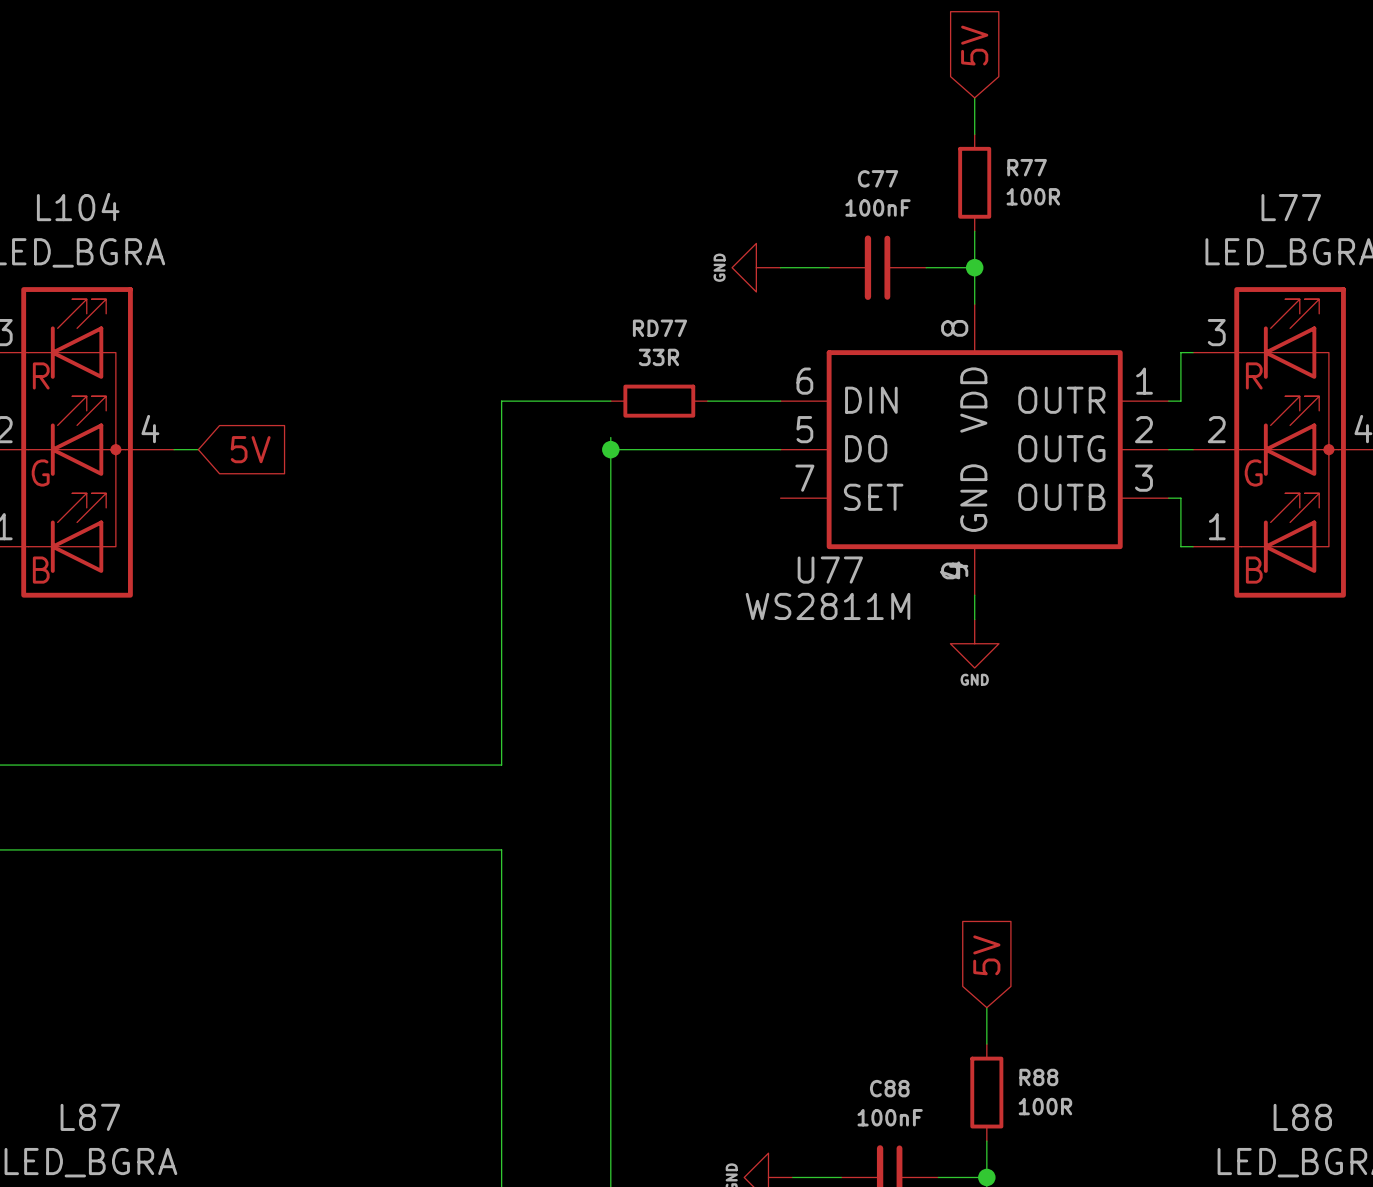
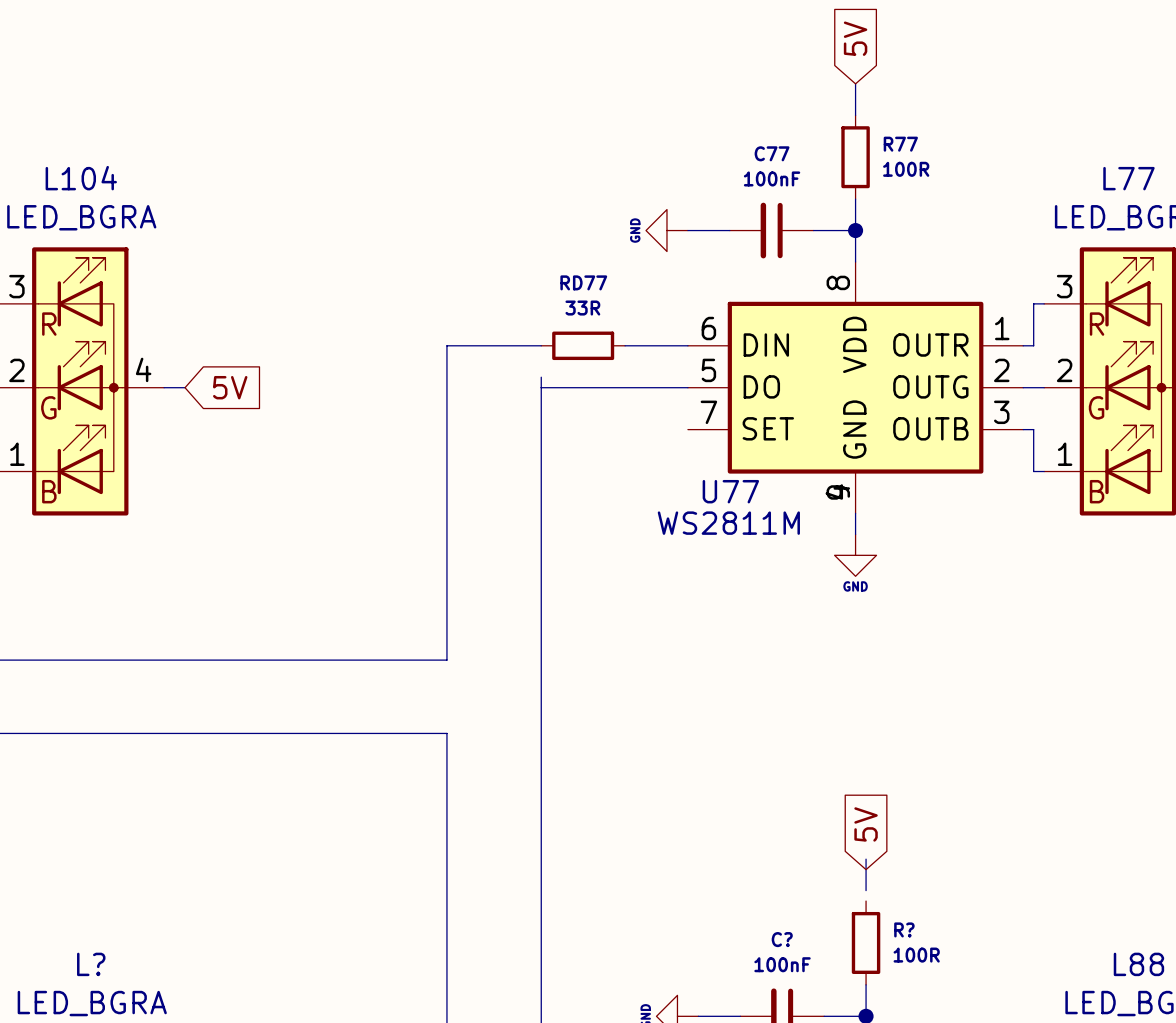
junction: (610, 449) -> none
wire: (986, 1031) (986, 1044) -> (866, 859) (866, 869)
R88 name: R88 (1038, 1077) -> R? (904, 929)
C88 name: C88 (889, 1088) -> C? (782, 939)
L87 name: L87 (90, 1117) -> L? (91, 964)

